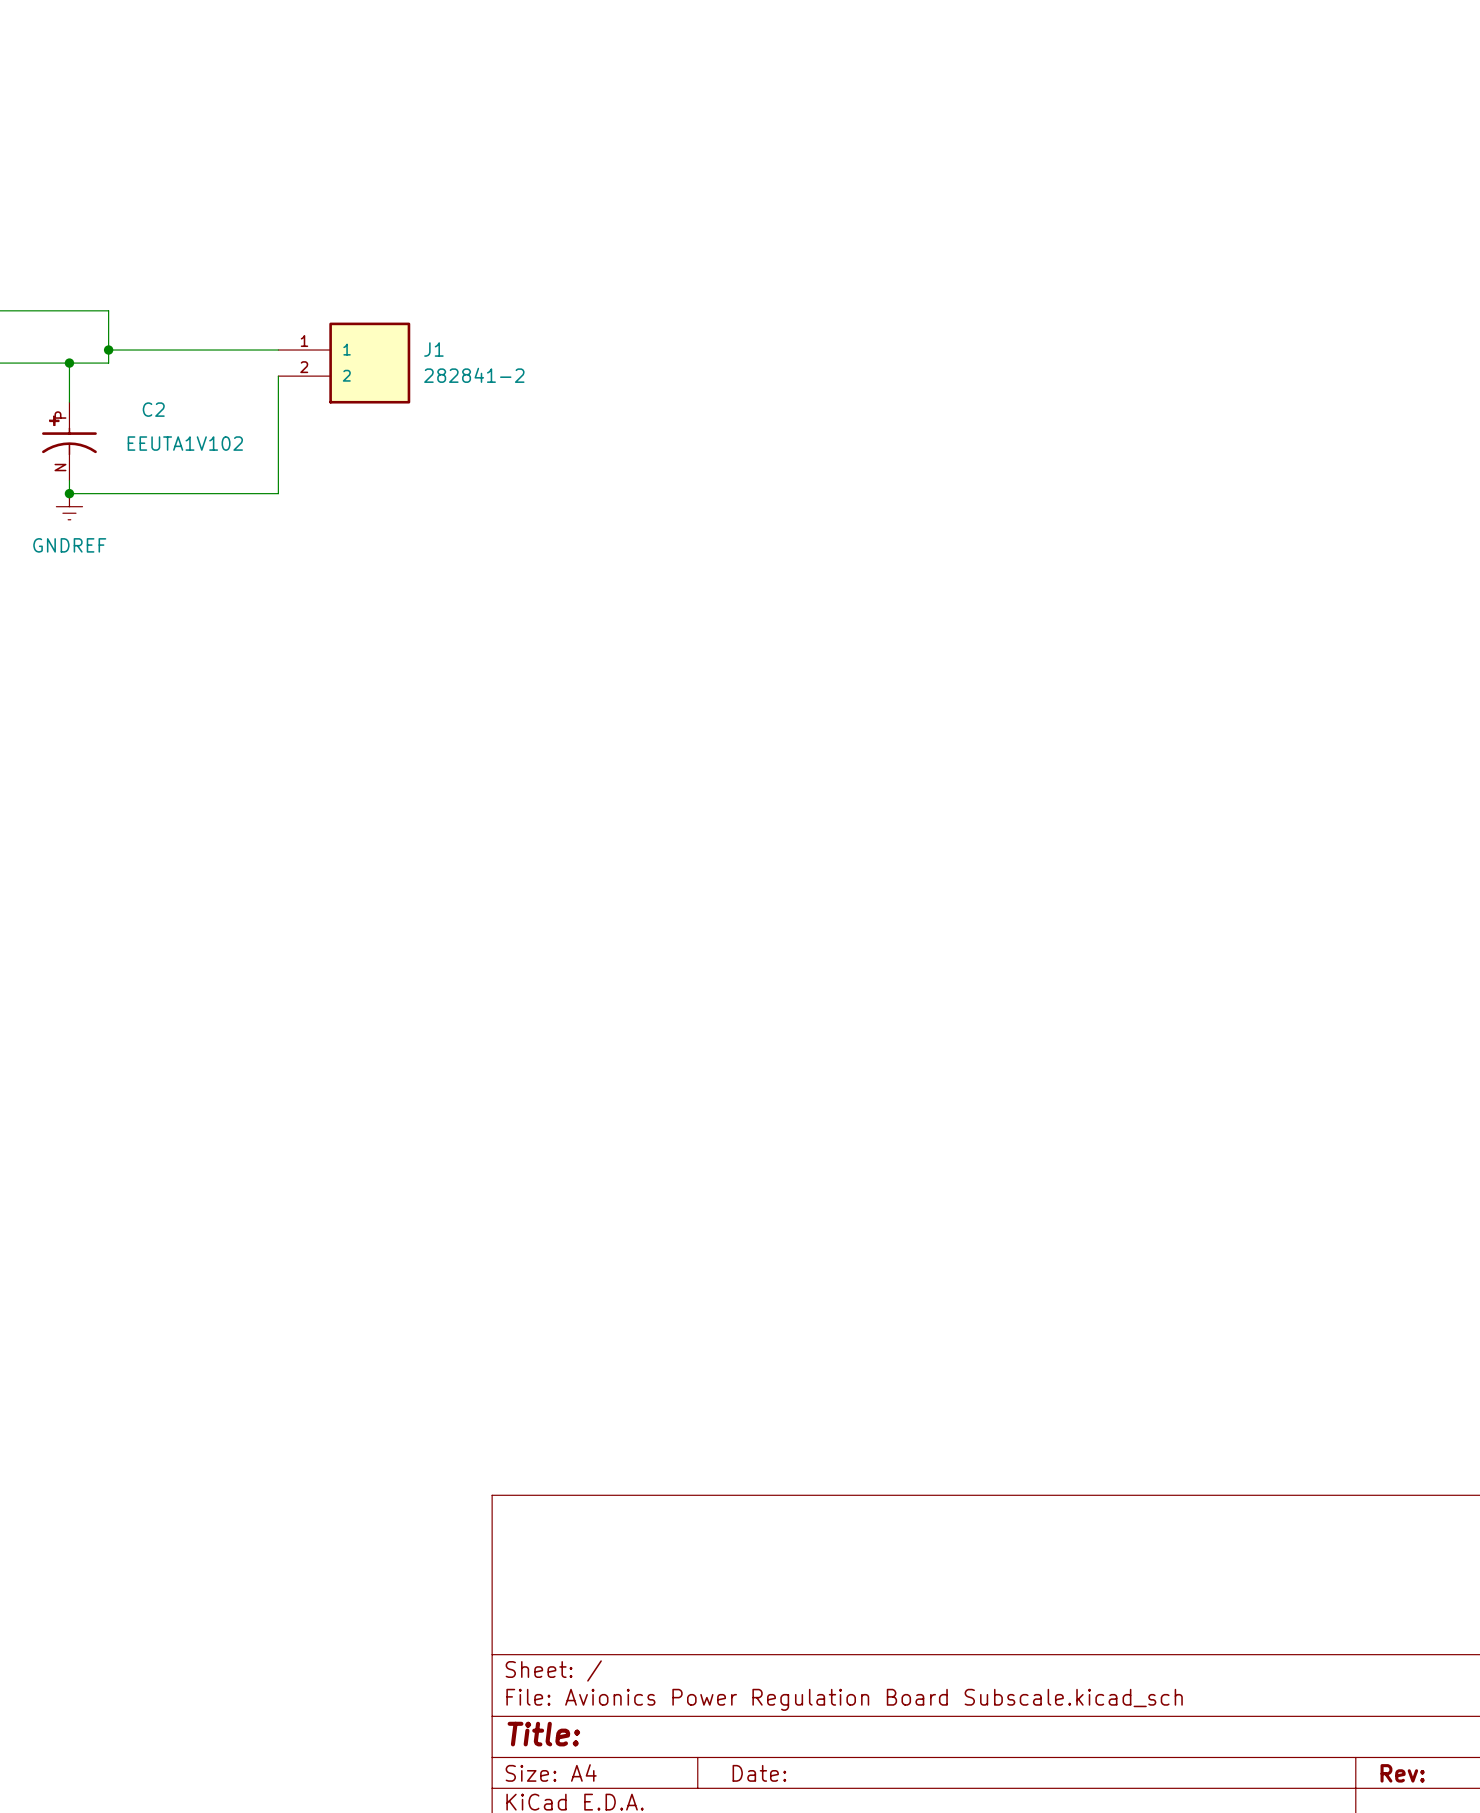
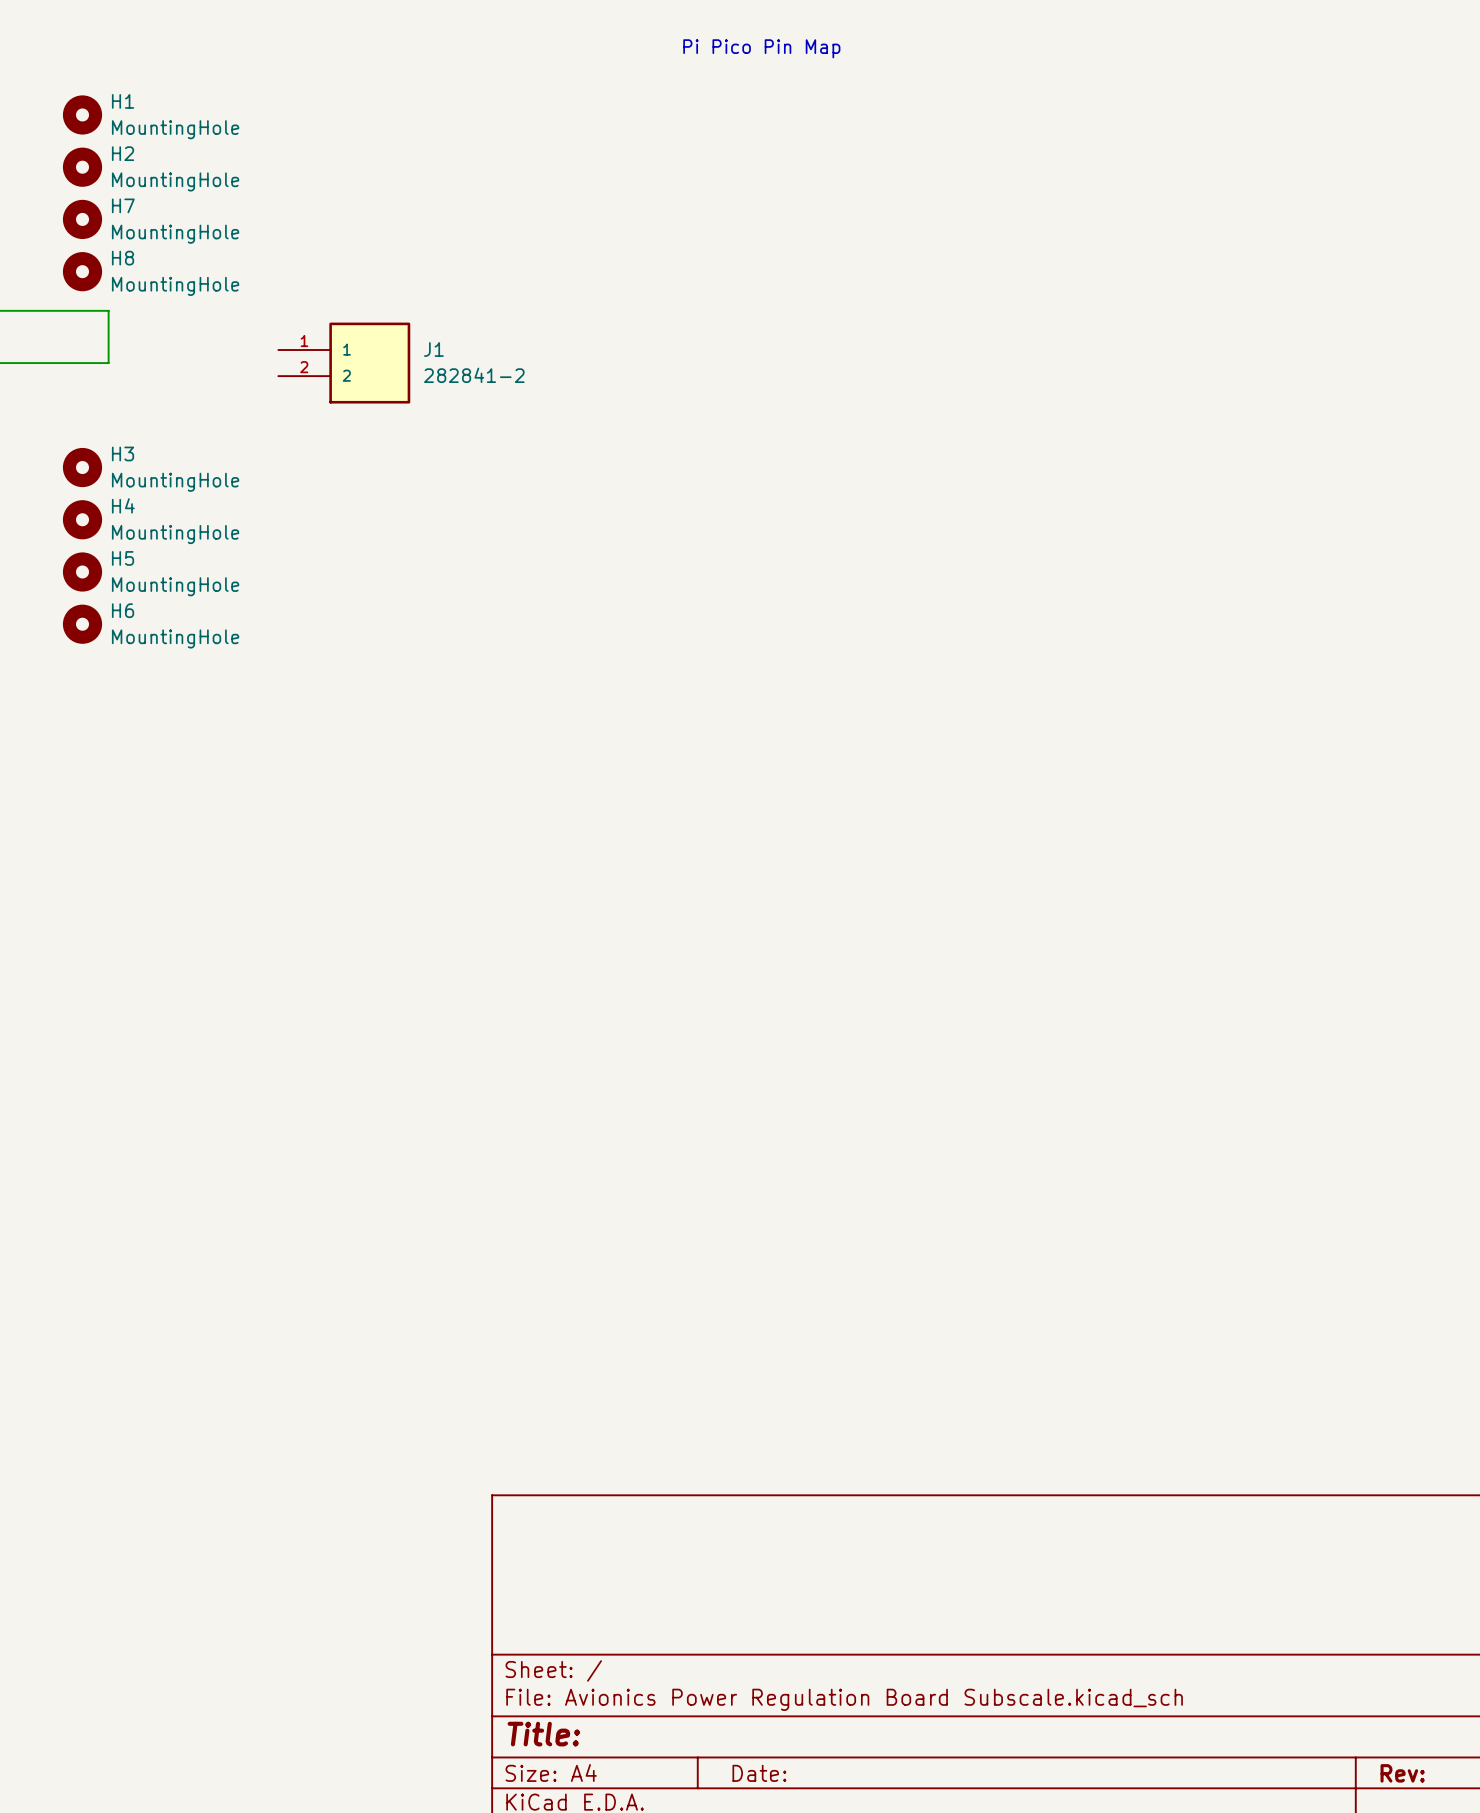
text: none -> Pi Pico Pin Map (761, 48)
H1: none -> MountingHole (82, 114)
H2: none -> MountingHole (82, 167)
H7: none -> MountingHole (82, 219)
H8: none -> MountingHole (82, 271)
wire: (108, 350) (278, 350) -> none
junction: (108, 350) -> none
wire: (69, 363) (69, 402) -> none
junction: (69, 363) -> none
wire: (278, 376) (278, 493) (69, 493) (69, 480) -> none
C2: EEUTA1V102 (69, 441) -> none
H3: none -> MountingHole (82, 467)
junction: (69, 493) -> none
power symbol: GNDREF (69, 506) -> none
H4: none -> MountingHole (82, 519)
H5: none -> MountingHole (82, 571)
H6: none -> MountingHole (82, 624)

